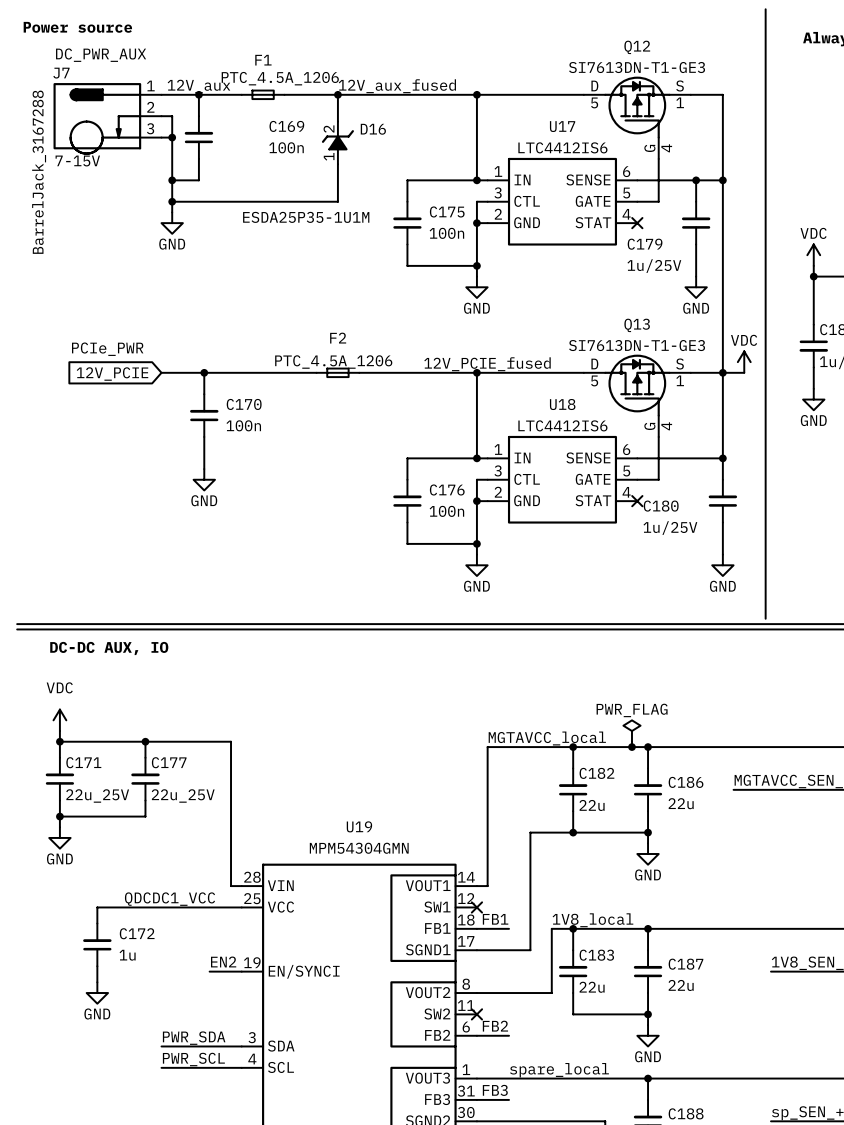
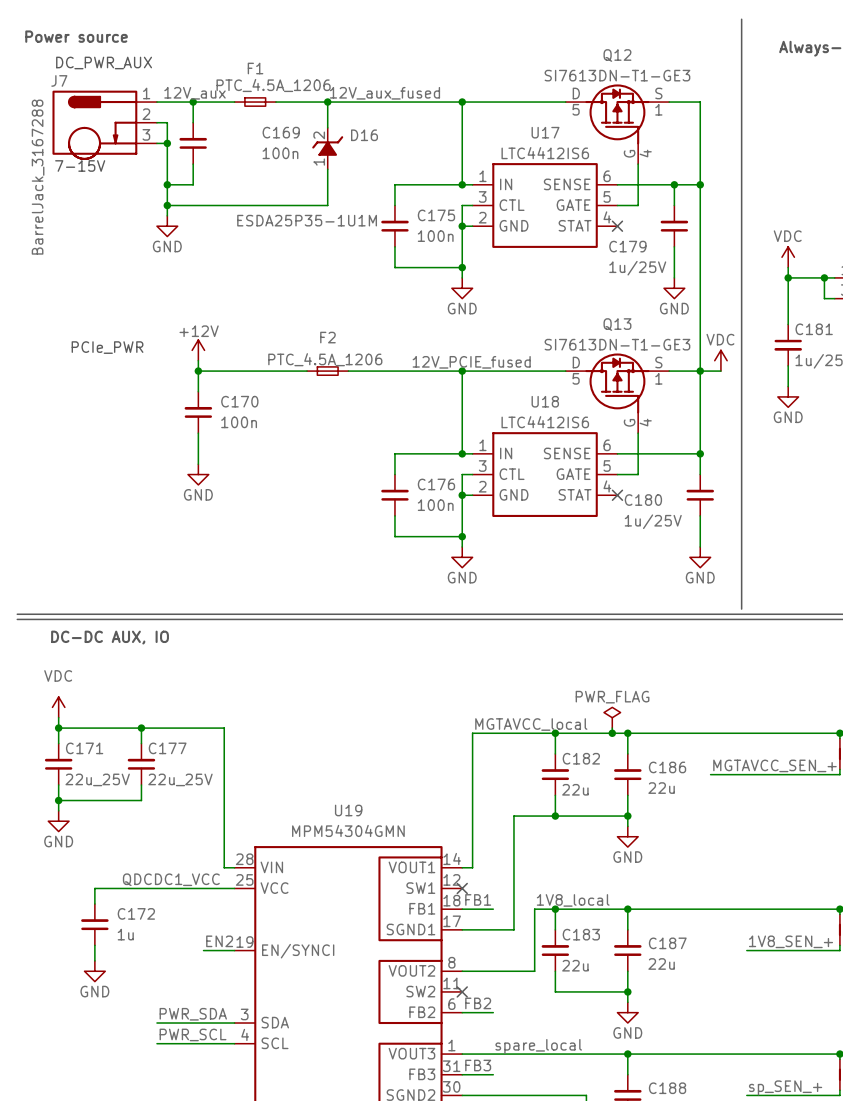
power symbol: none -> +12V (198, 350)
wire: (161, 372) (204, 372) -> (198, 360) (198, 371)
global label: 12V_PCIE (112, 374) -> none

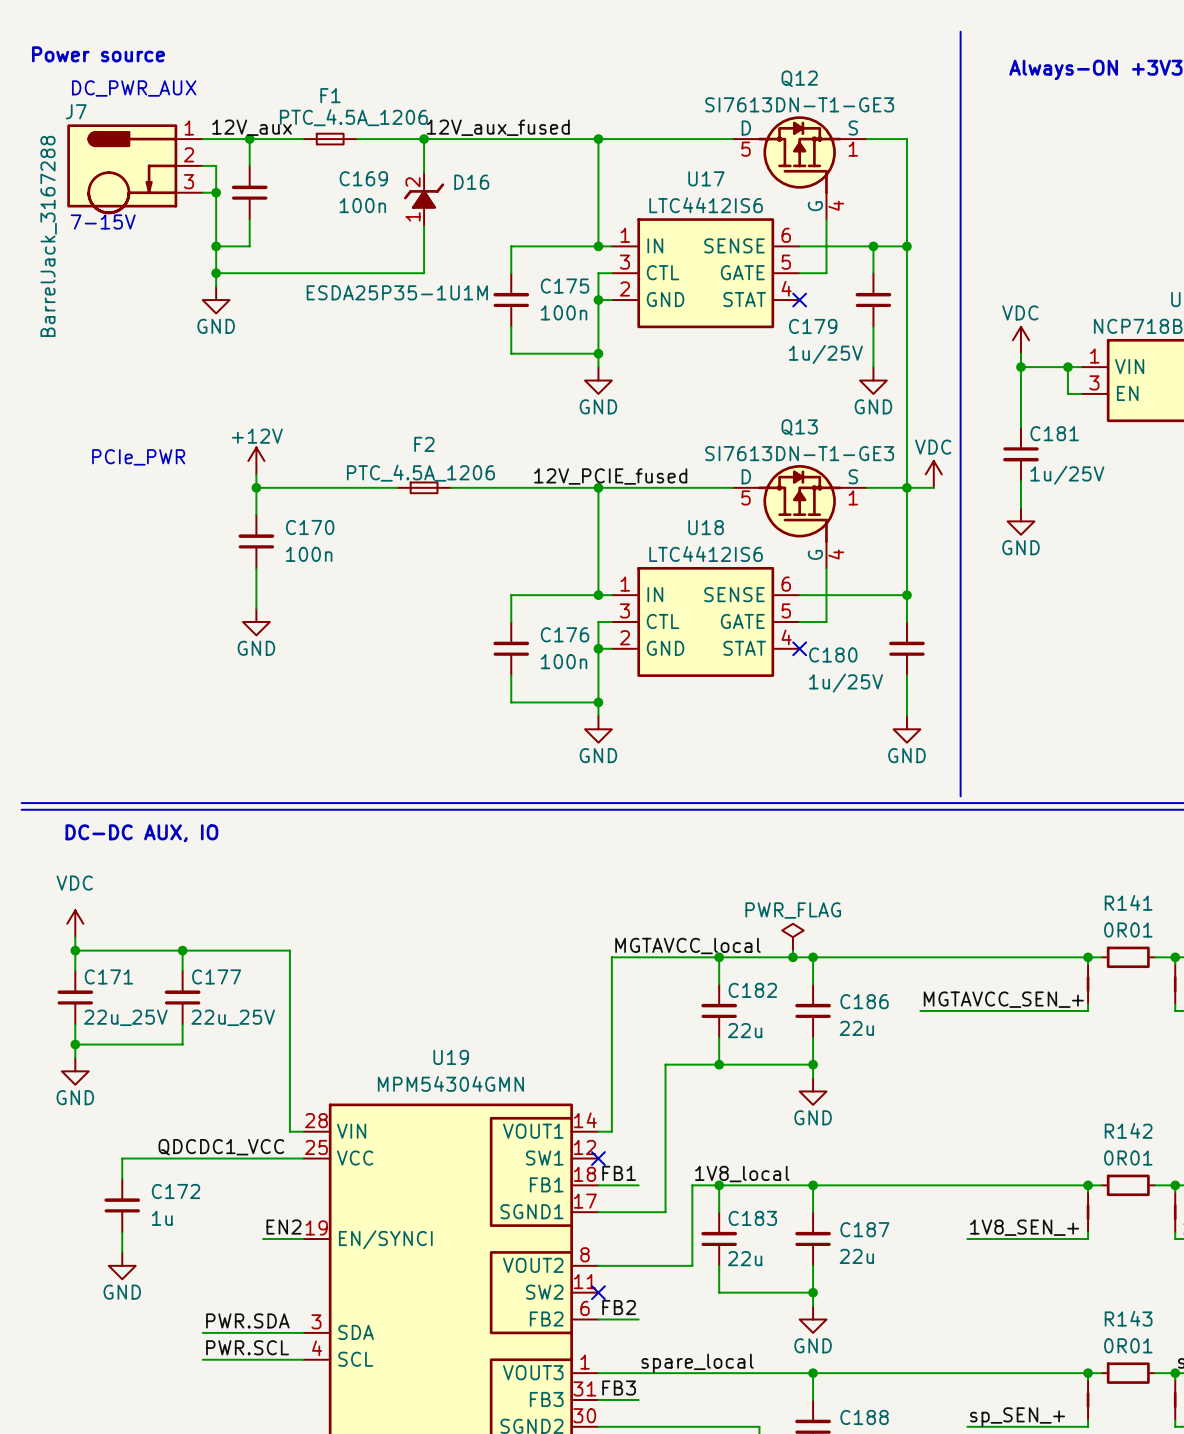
label: PWR_SDA (193, 1014) -> PWR.SDA (247, 1320)
label: PWR_SCL (193, 1034) -> PWR.SCL (247, 1347)

